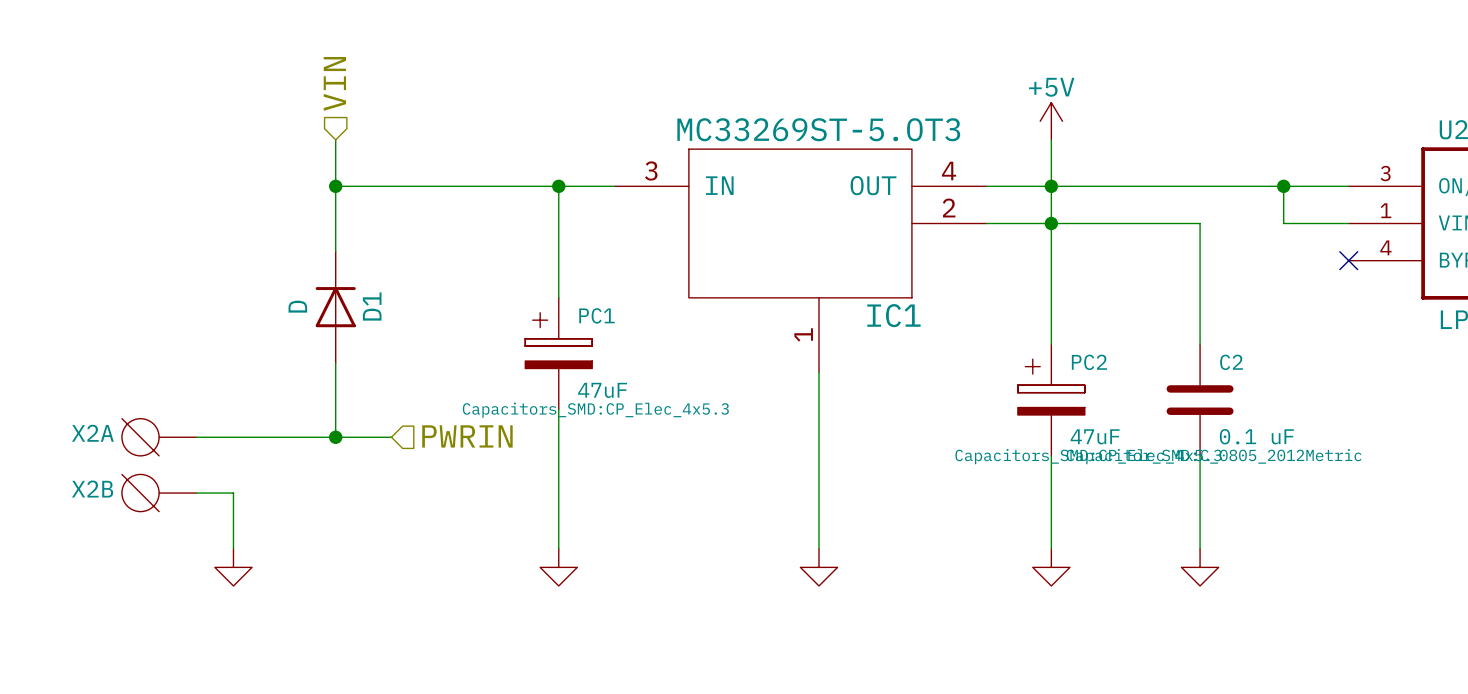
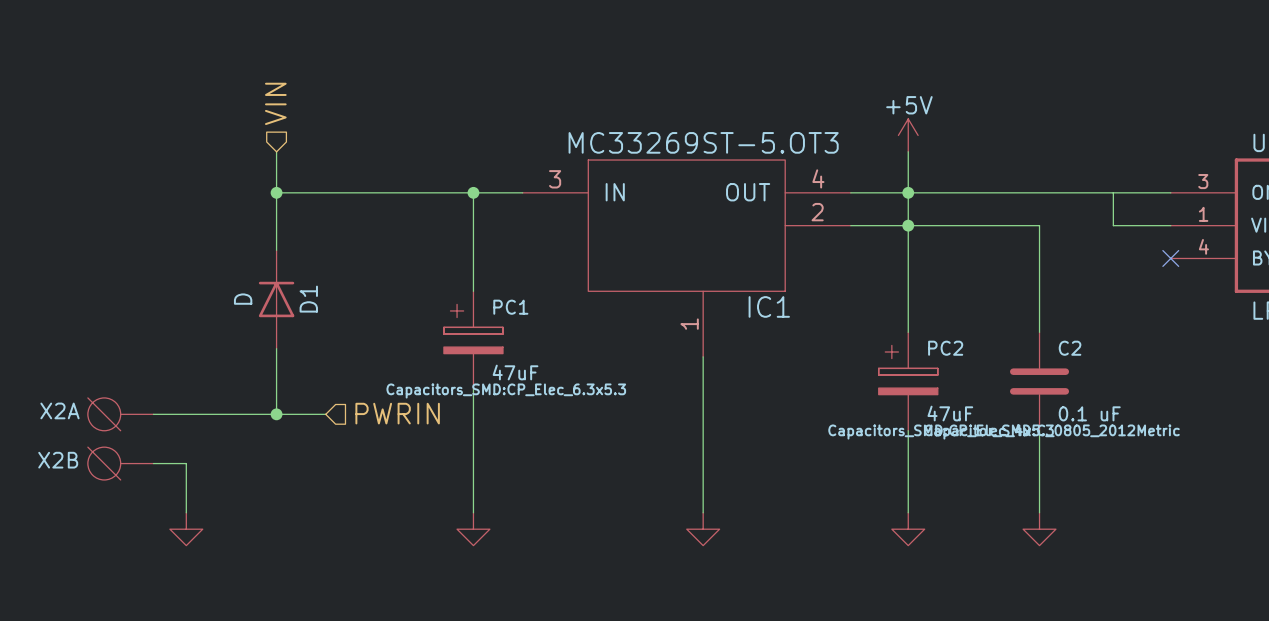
junction: (1283, 186) -> none
PC1 text: Capacitors_SMD:CP_Elec_4x5.3 (595, 410) -> Capacitors_SMD:CP_Elec_6.3x5.3 (506, 391)

